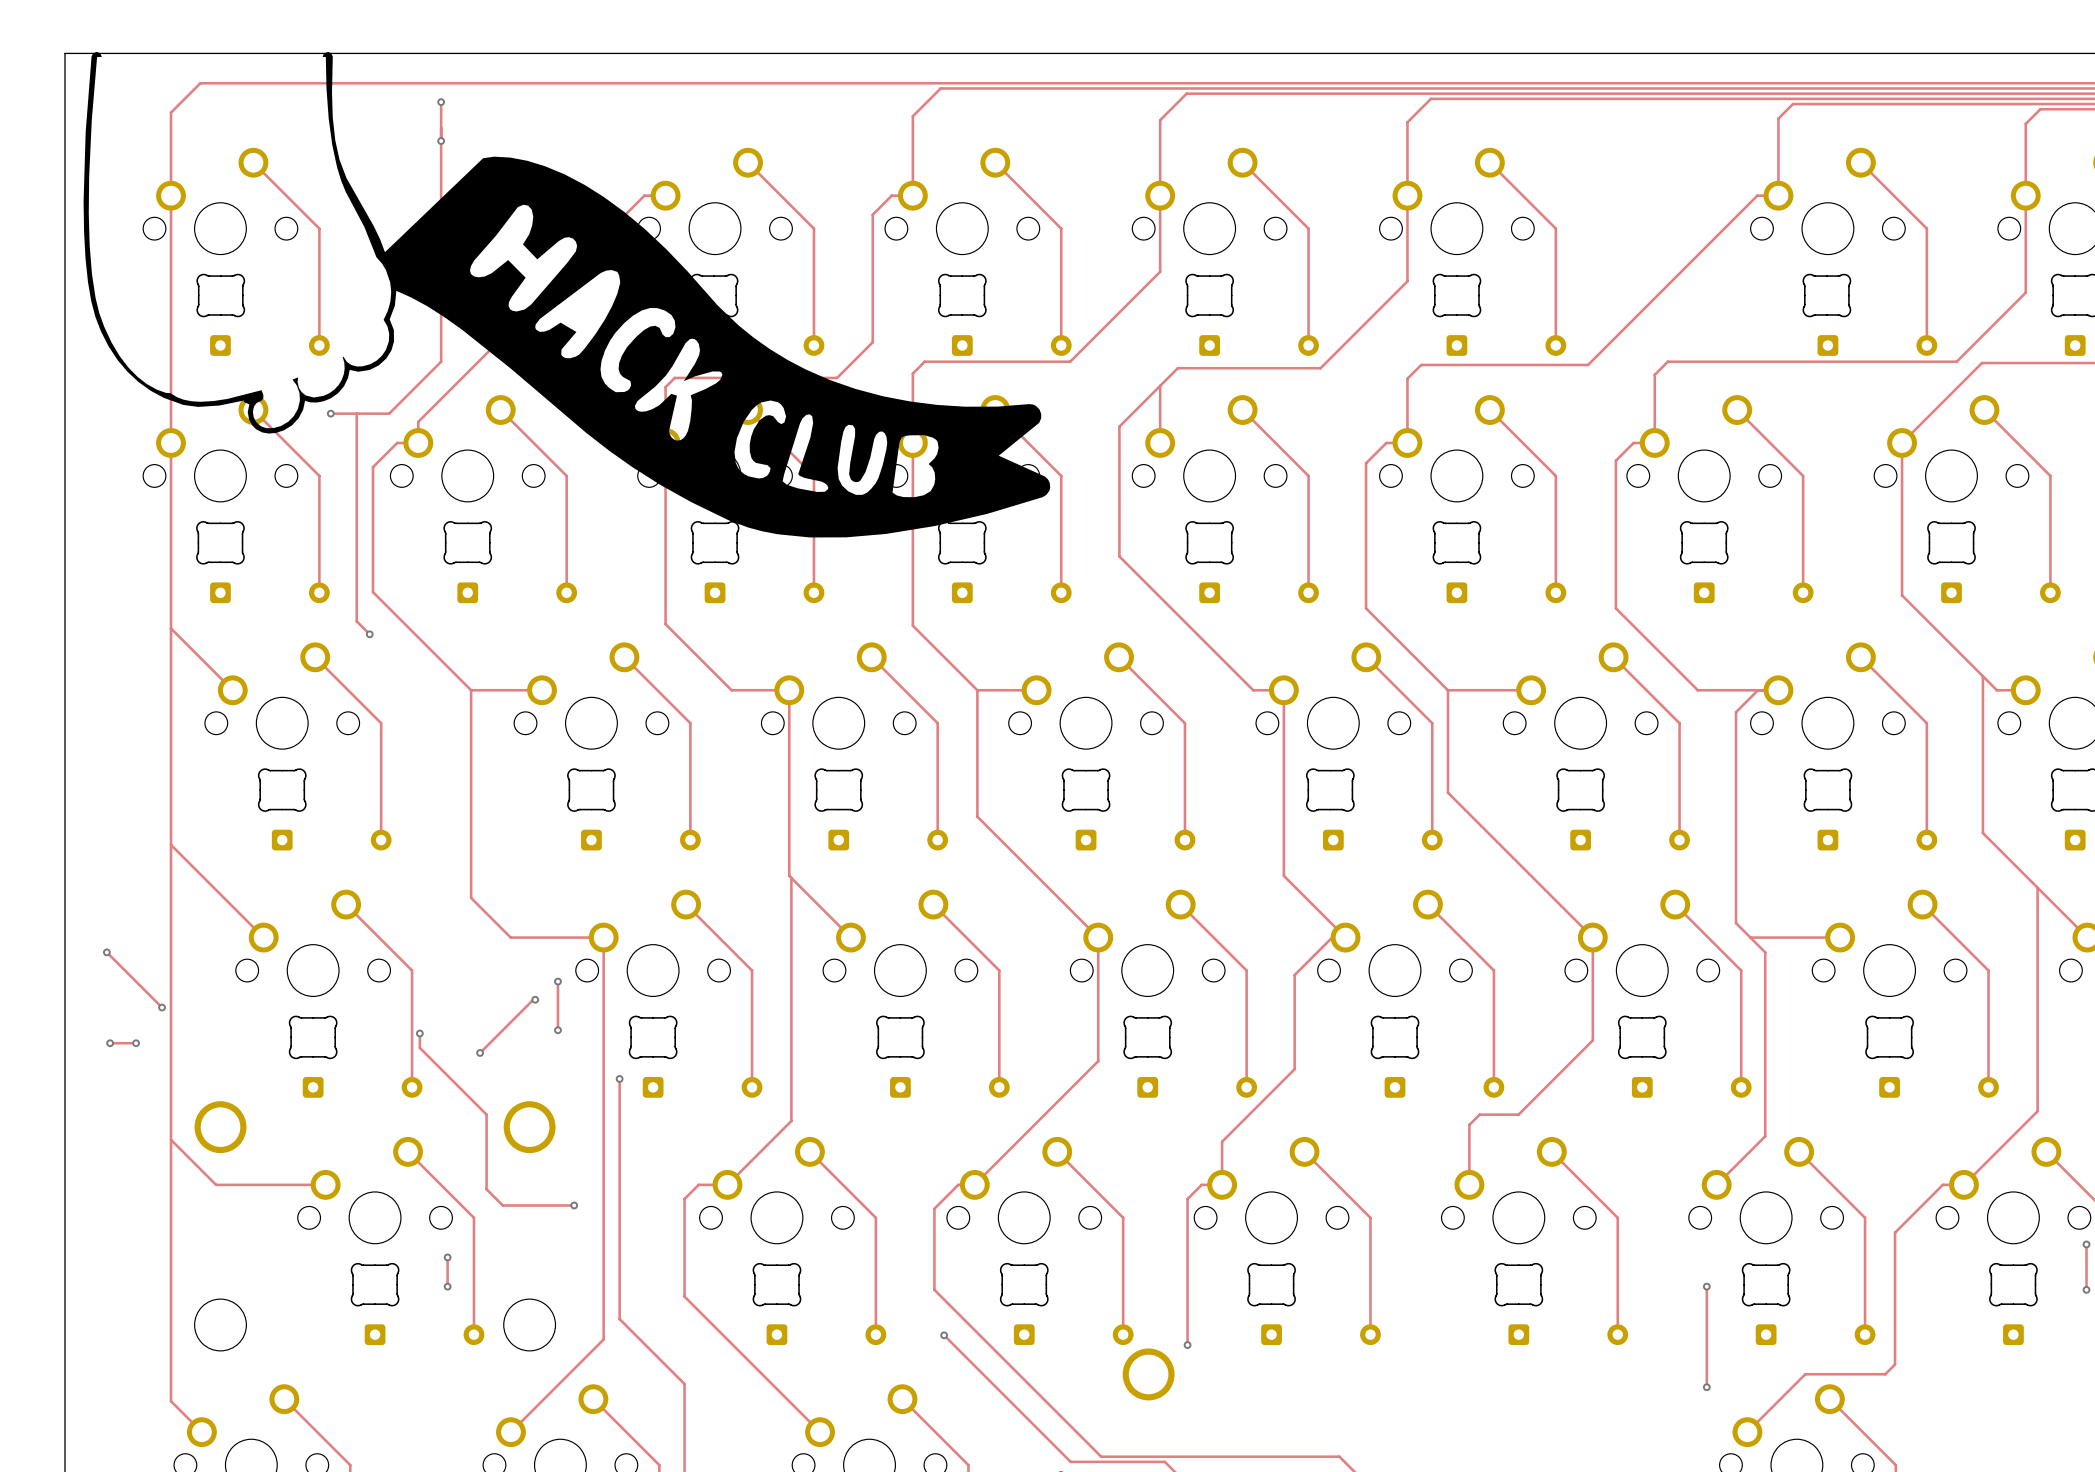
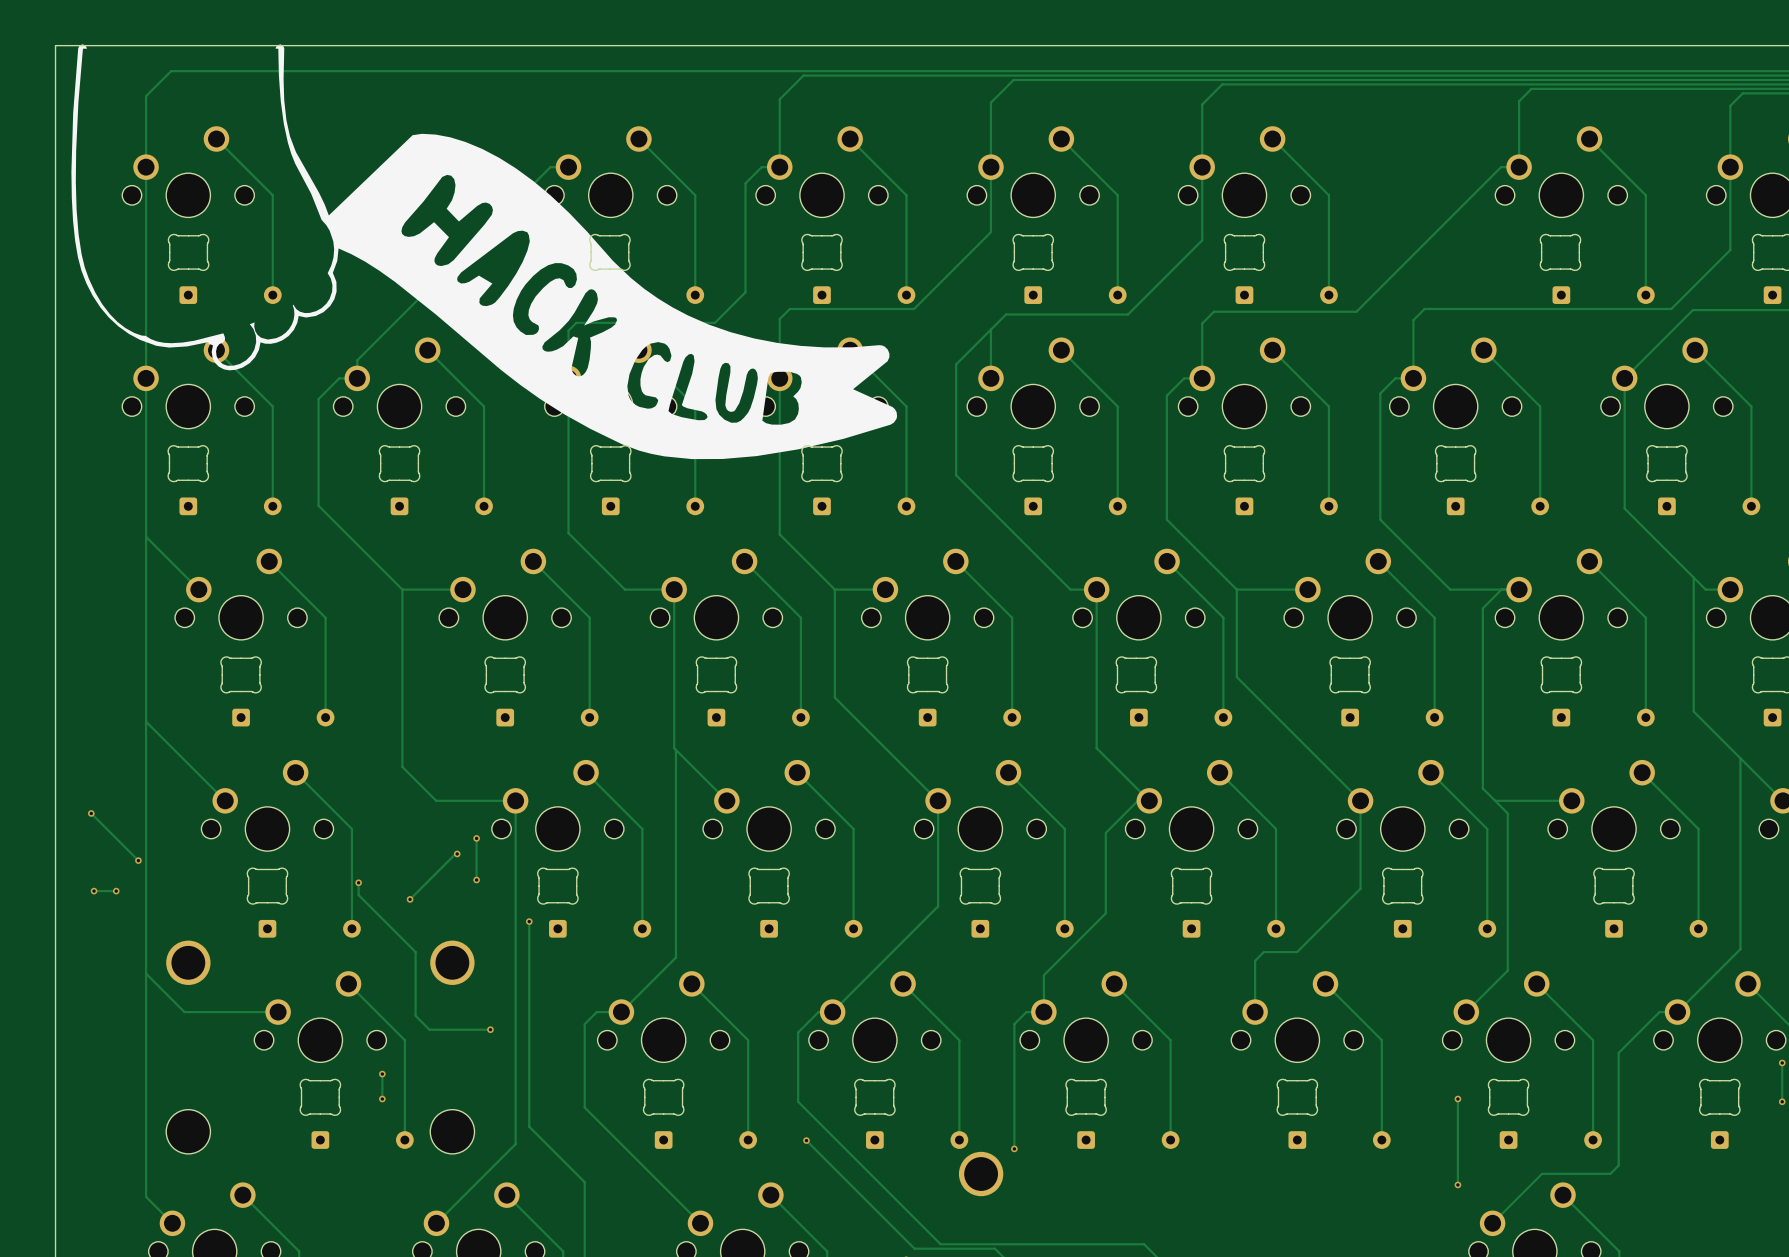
track: (441, 102) (441, 361) (389, 413) (330, 413) -> none
via: (441, 102) -> none
via: (441, 141) -> none
via: (330, 413) -> none
track: (356, 413) (356, 621) (369, 634) -> none
via: (369, 634) -> none

